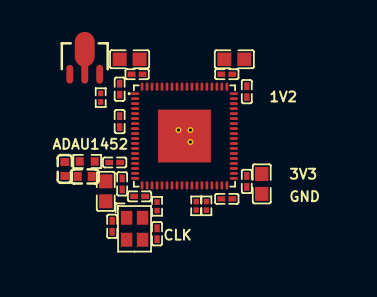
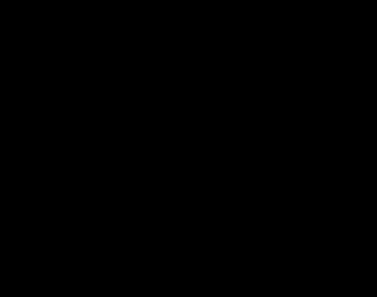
part: (84, 57) -> none
part: (129, 59) -> none
part: (234, 59) -> none
part: (137, 74) -> none
part: (226, 74) -> none
part: (119, 89) -> none
part: (246, 91) -> none
text: 1V2 (283, 96) -> none
part: (100, 97) -> none
part: (119, 121) -> none
part: (182, 136) -> none
text: ADAU1452 (89, 143) -> none
part: (87, 161) -> none
part: (114, 162) -> none
part: (64, 168) -> none
text: 3V3 (303, 173) -> none
part: (84, 176) -> none
part: (246, 181) -> none
part: (122, 183) -> none
part: (261, 183) -> none
part: (105, 191) -> none
part: (139, 196) -> none
text: GND (304, 196) -> none
part: (226, 198) -> none
part: (196, 205) -> none
part: (206, 205) -> none
part: (157, 206) -> none
part: (112, 226) -> none
part: (133, 227) -> none
part: (157, 233) -> none
text: CLK (177, 234) -> none

